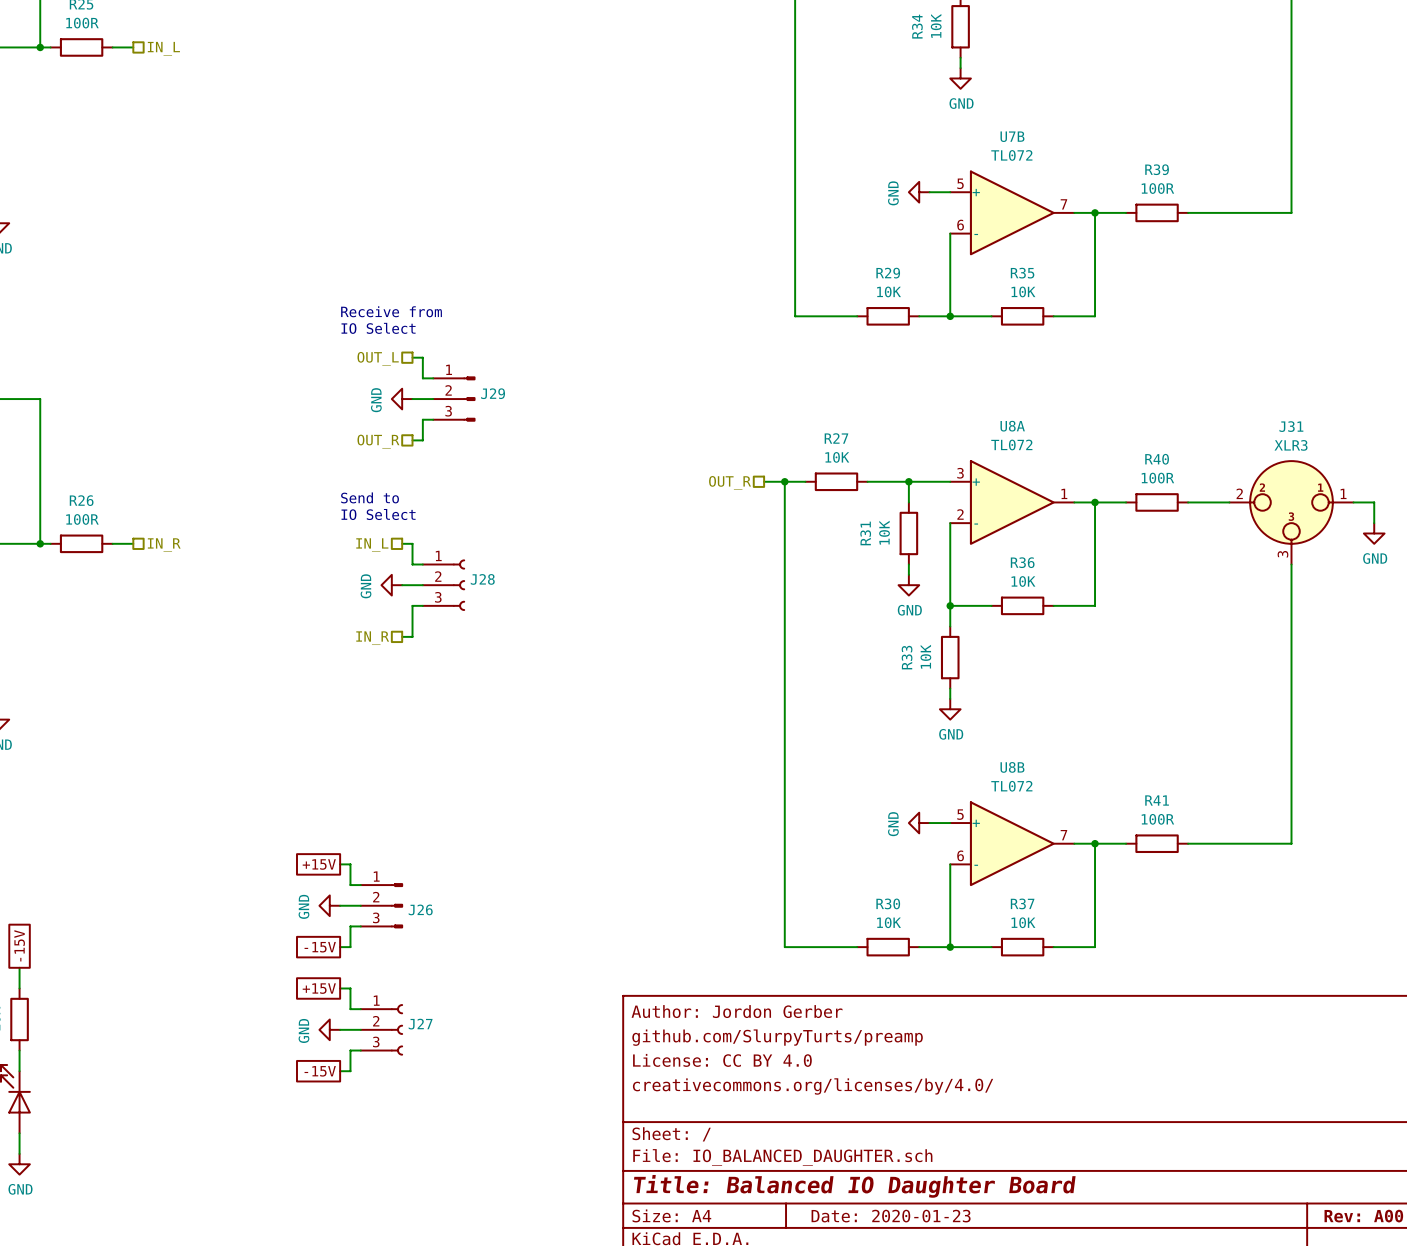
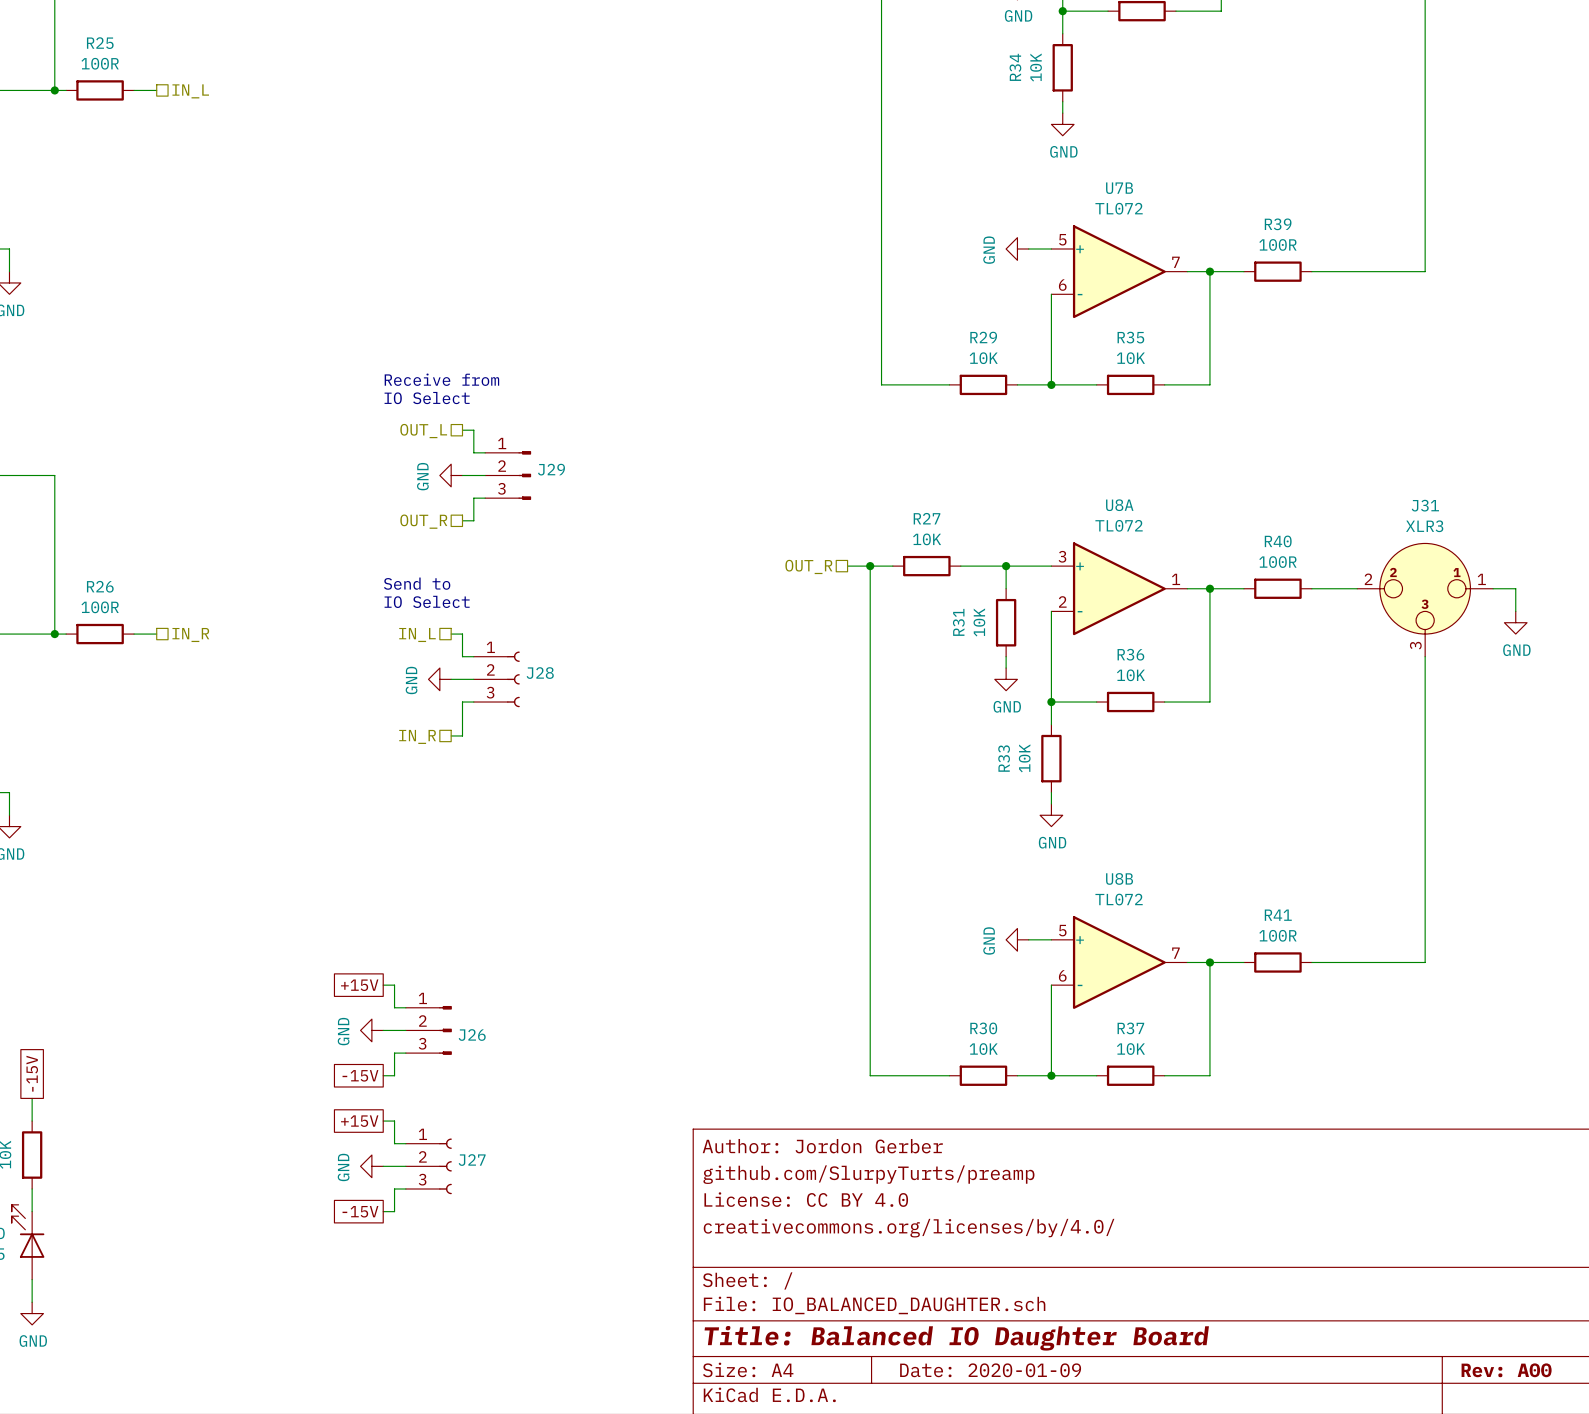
title block: Date: 2020-01-23 (891, 1216) -> Date: 2020-01-09 (990, 1370)

